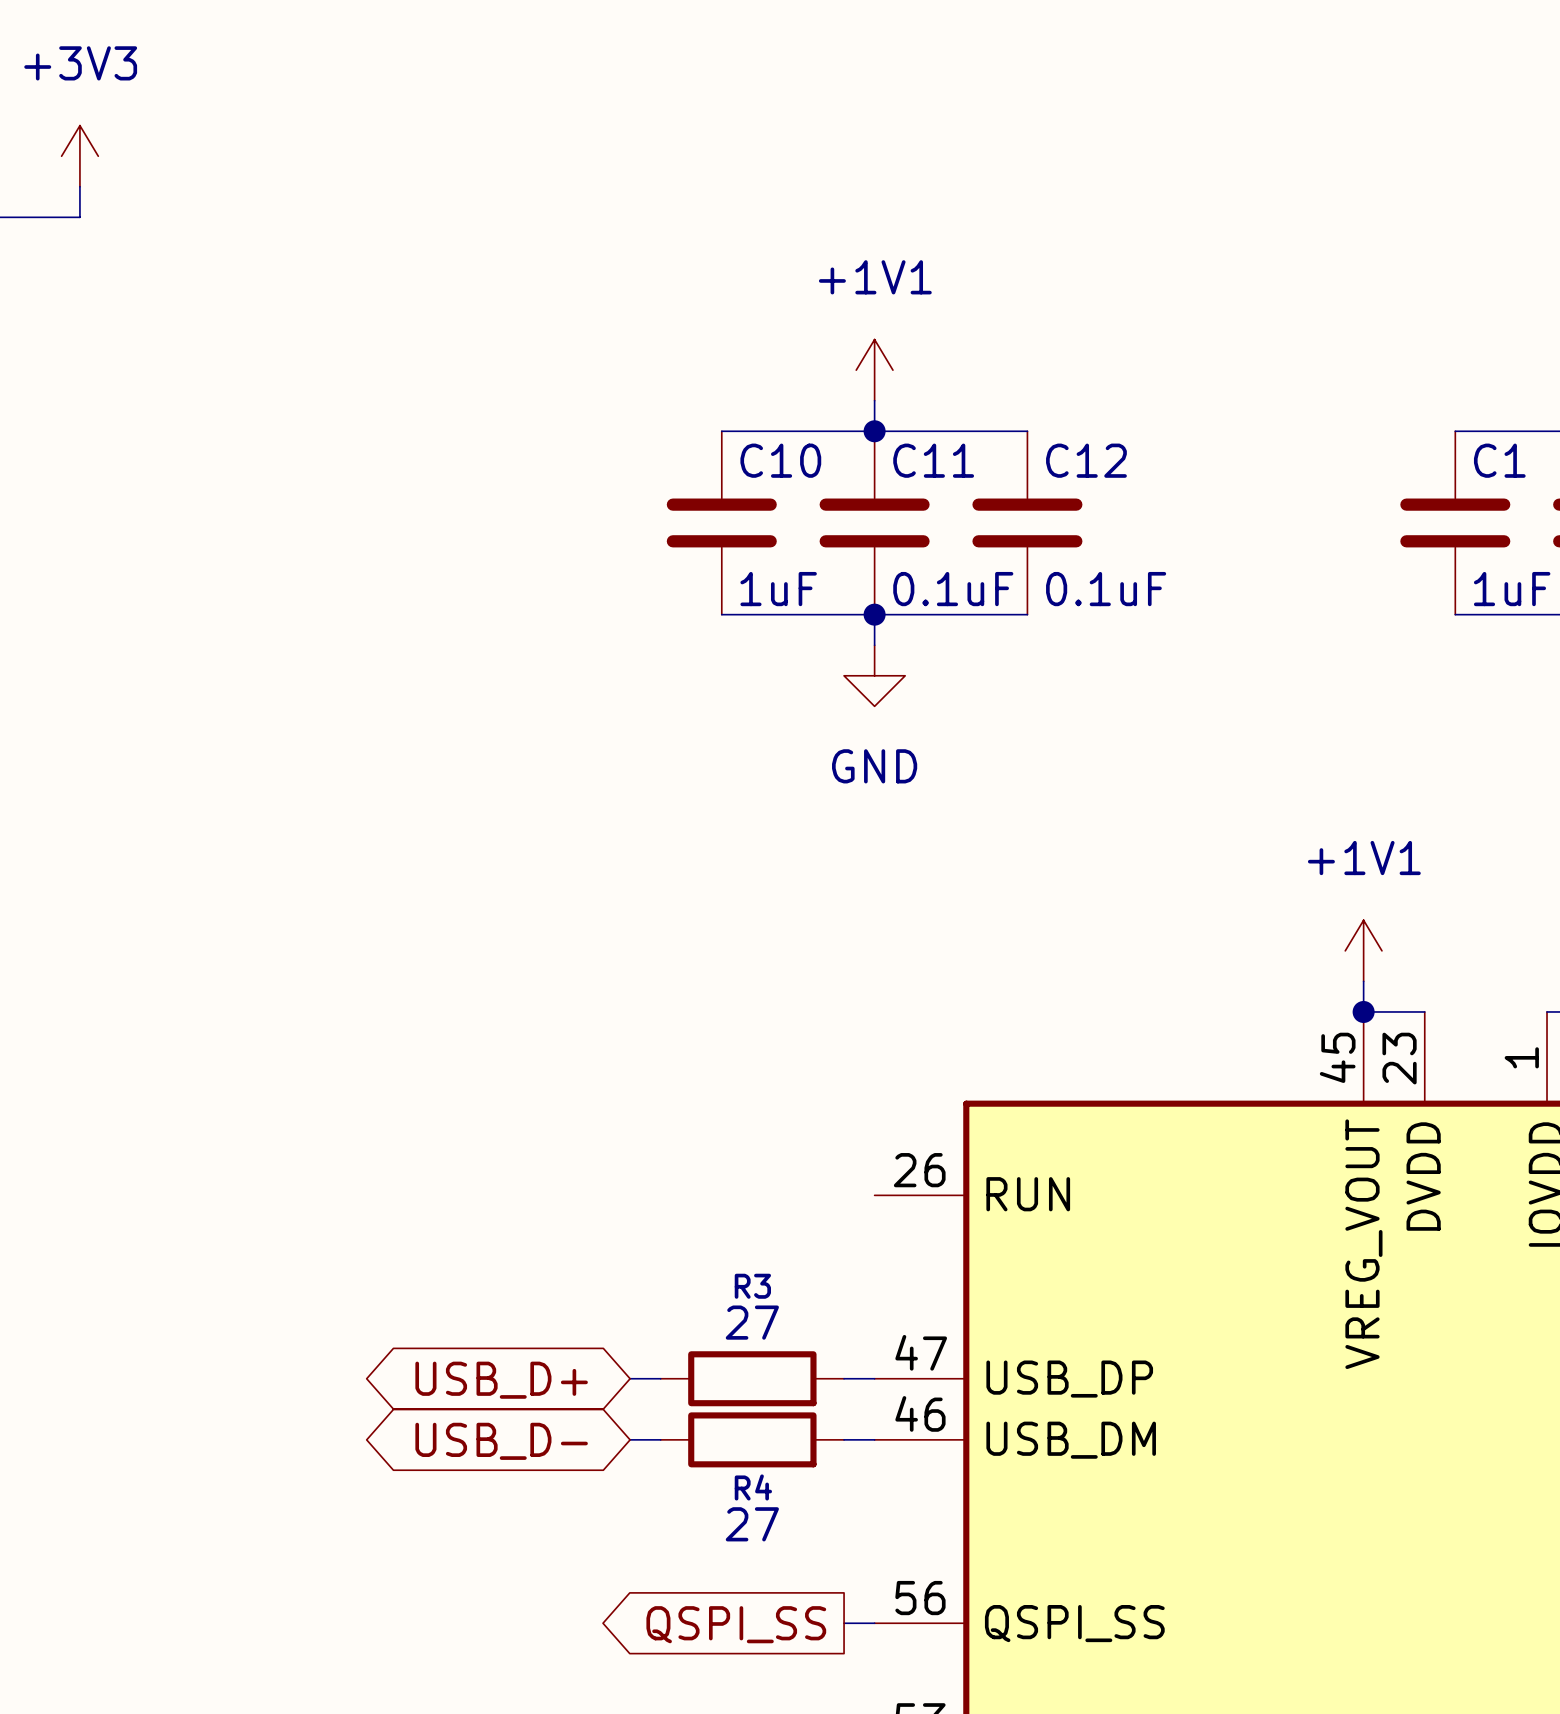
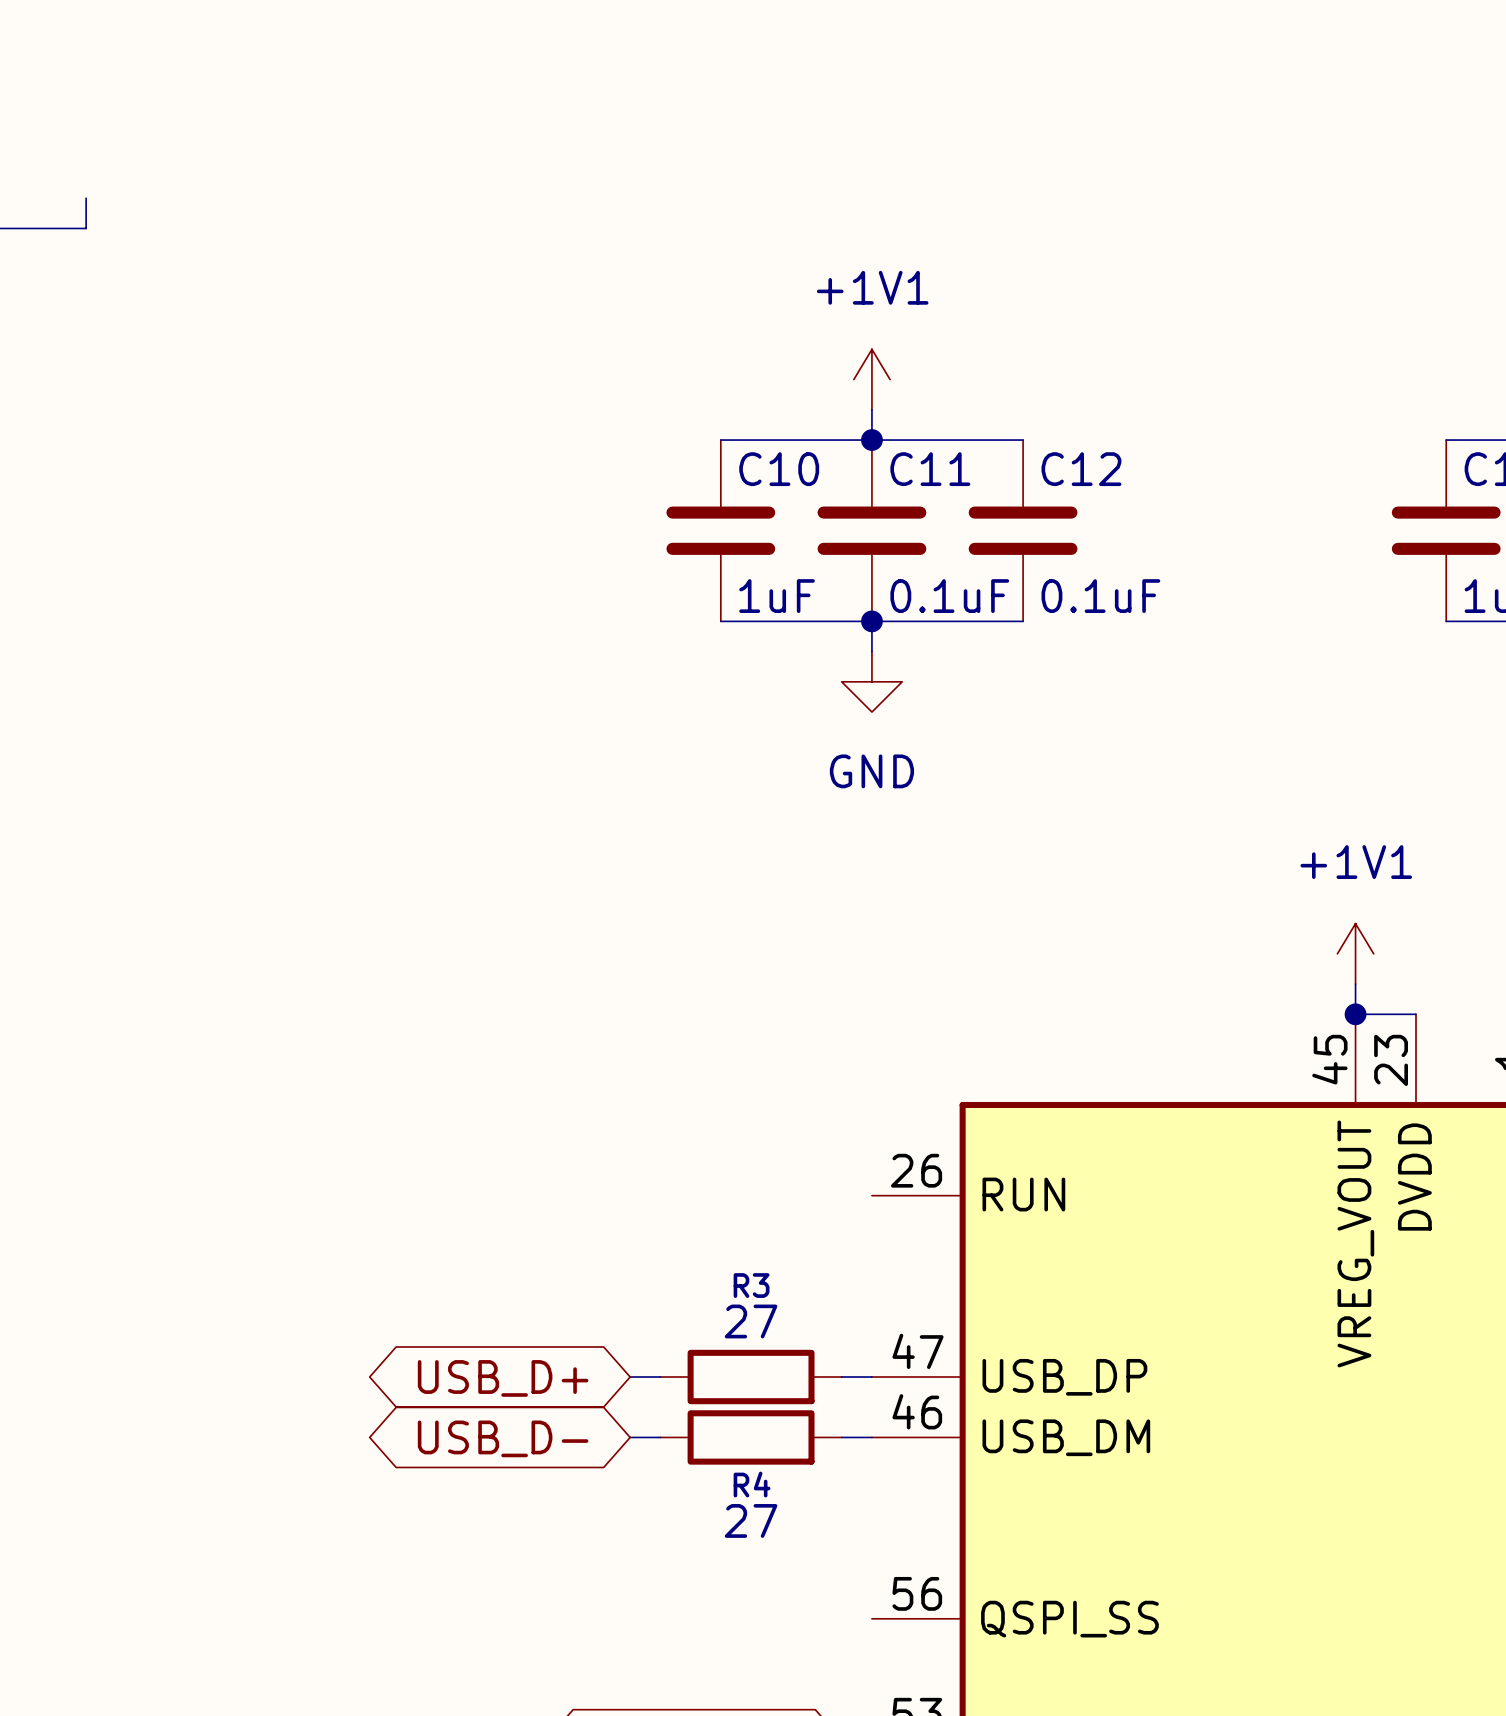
power symbol: +3V3 (79, 156) -> none
wire: (844, 1623) (874, 1623) -> none
global label: QSPI_SS (736, 1624) -> none

